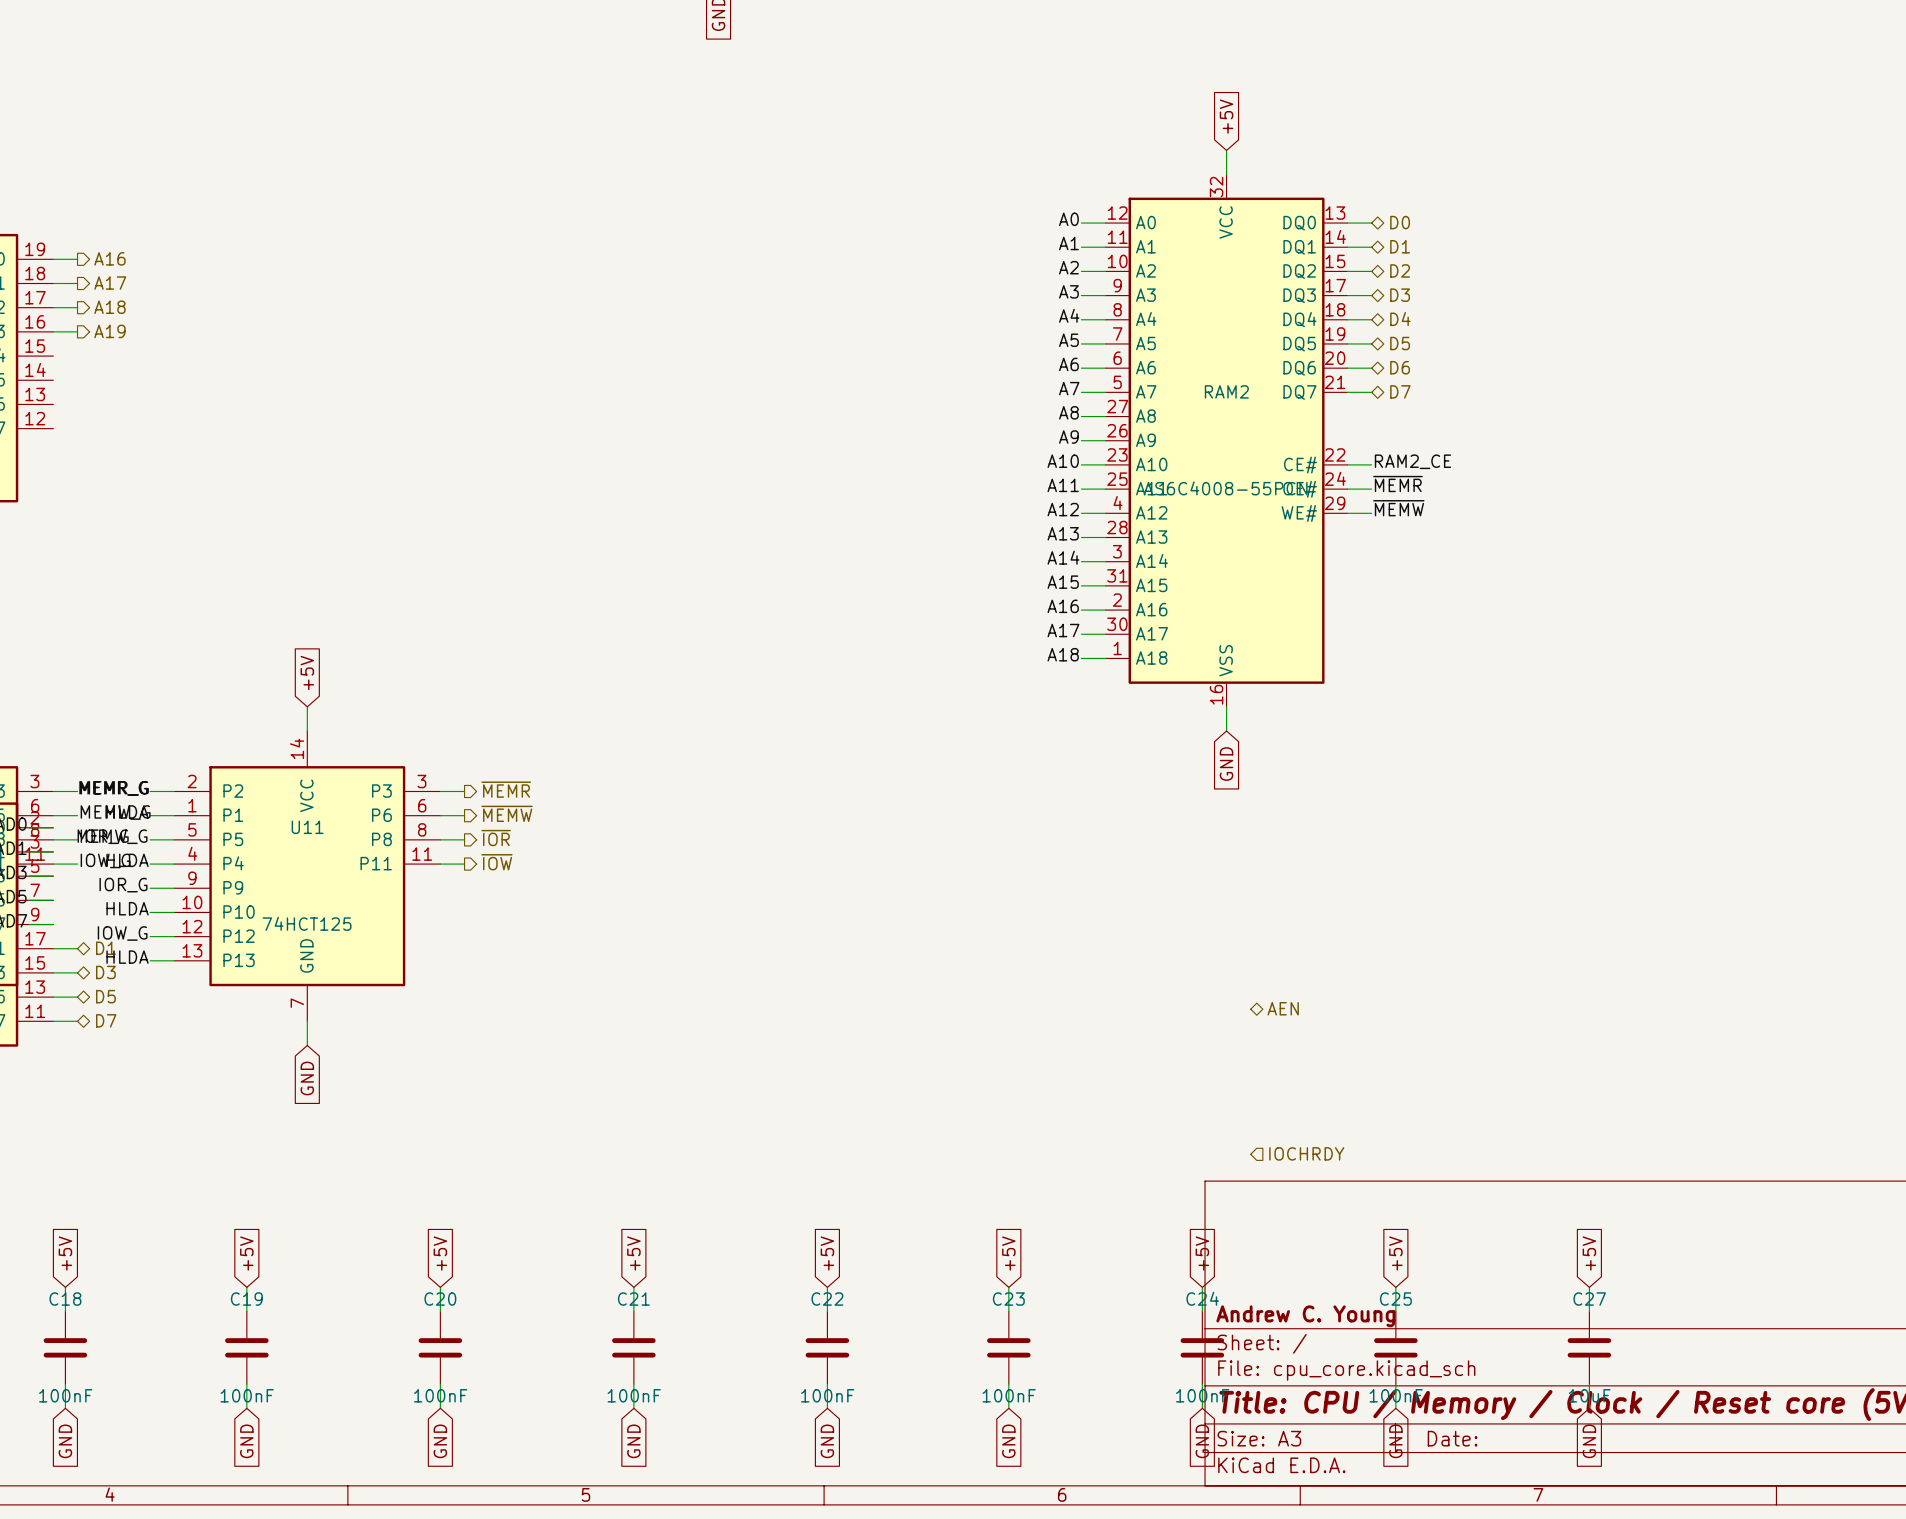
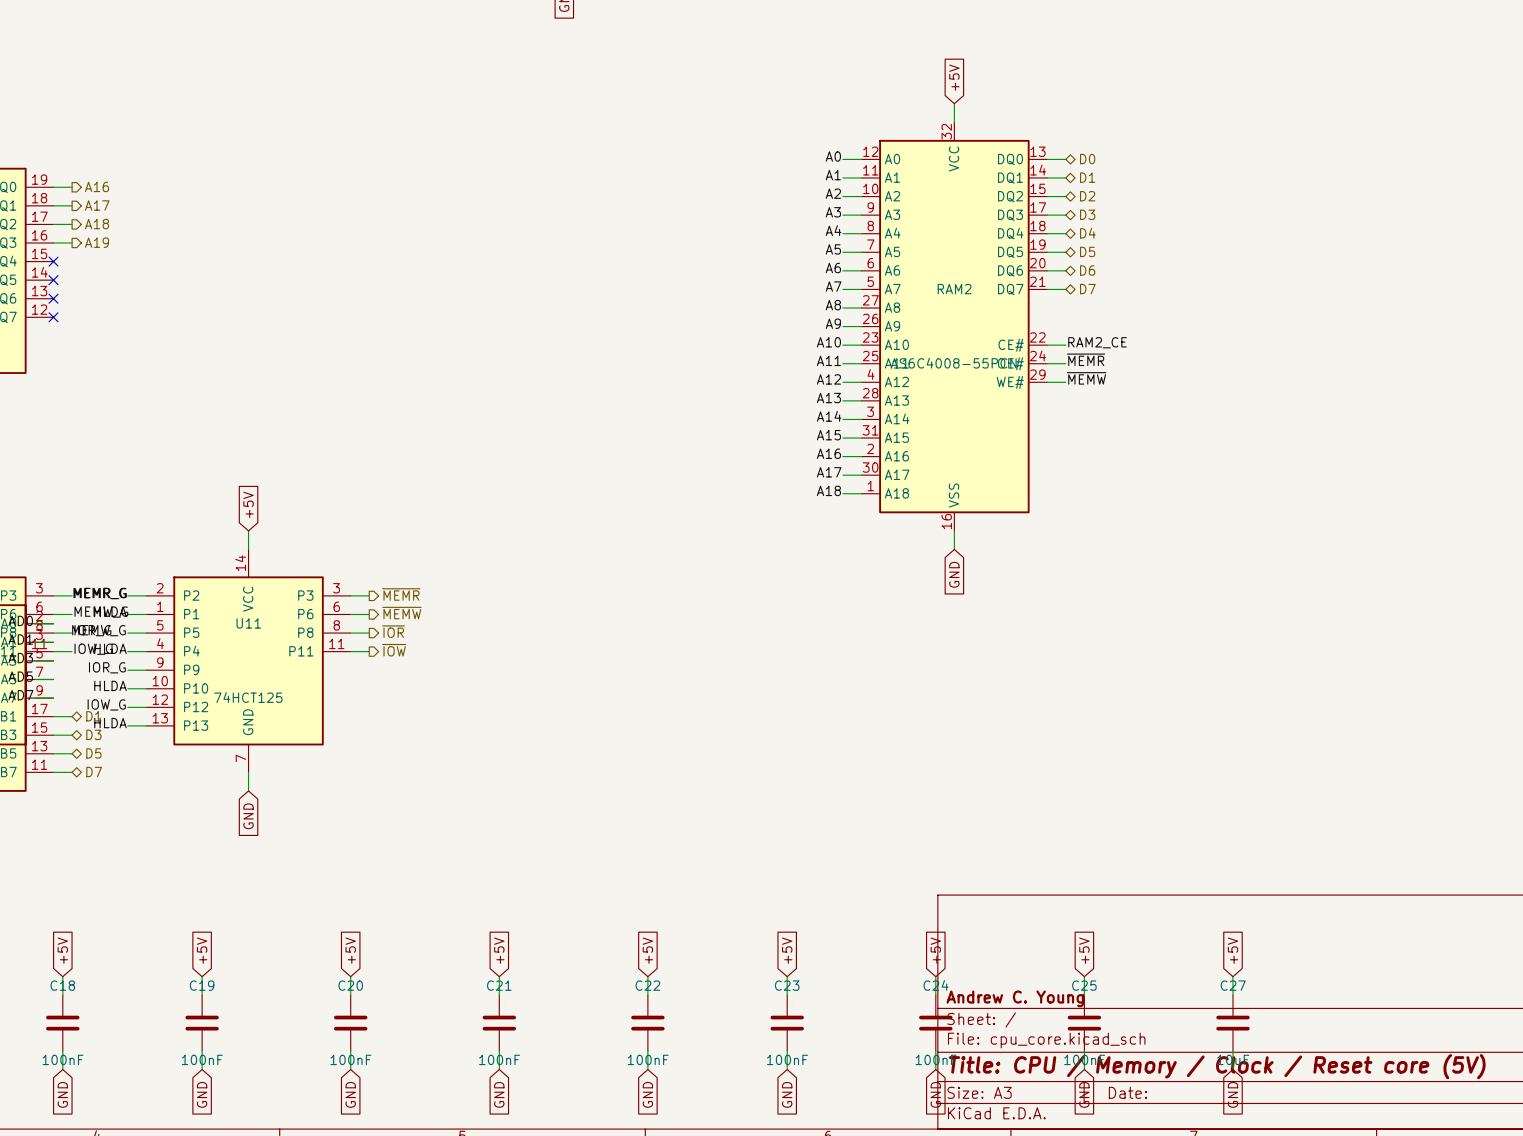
no-connect mark: none -> (53, 261)
no-connect mark: none -> (53, 280)
no-connect mark: none -> (53, 298)
no-connect mark: none -> (53, 317)
hierarchical label: AEN (1283, 1008) -> none
hierarchical label: IOCHRDY (1306, 1153) -> none

